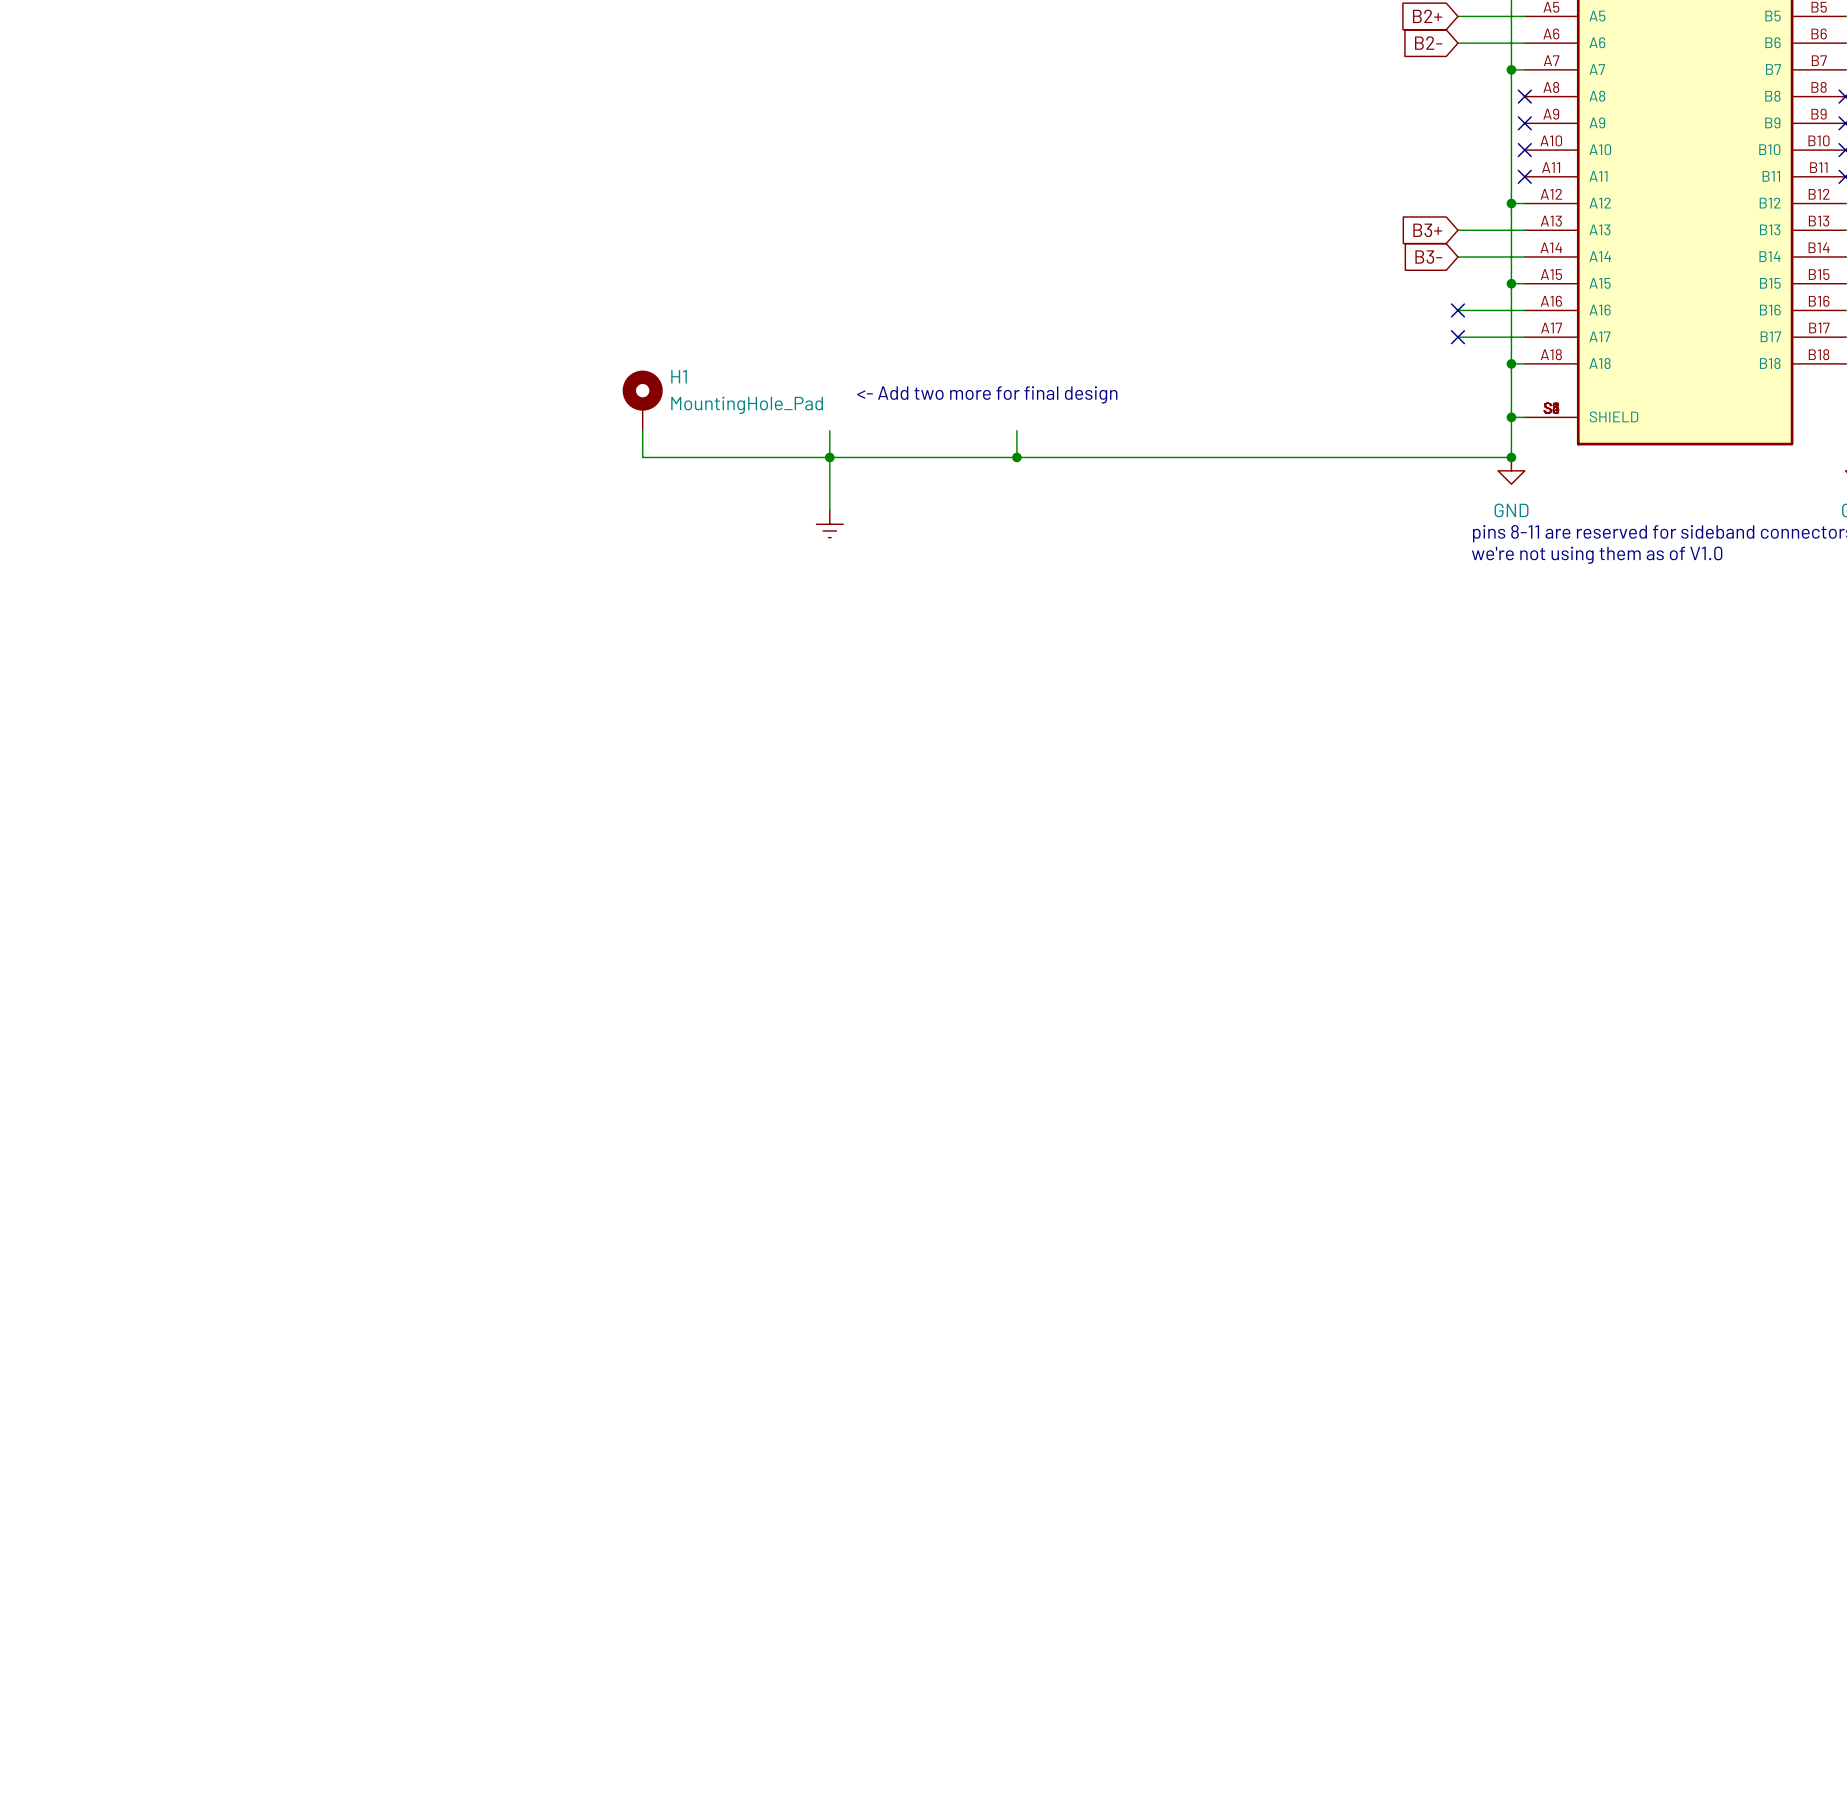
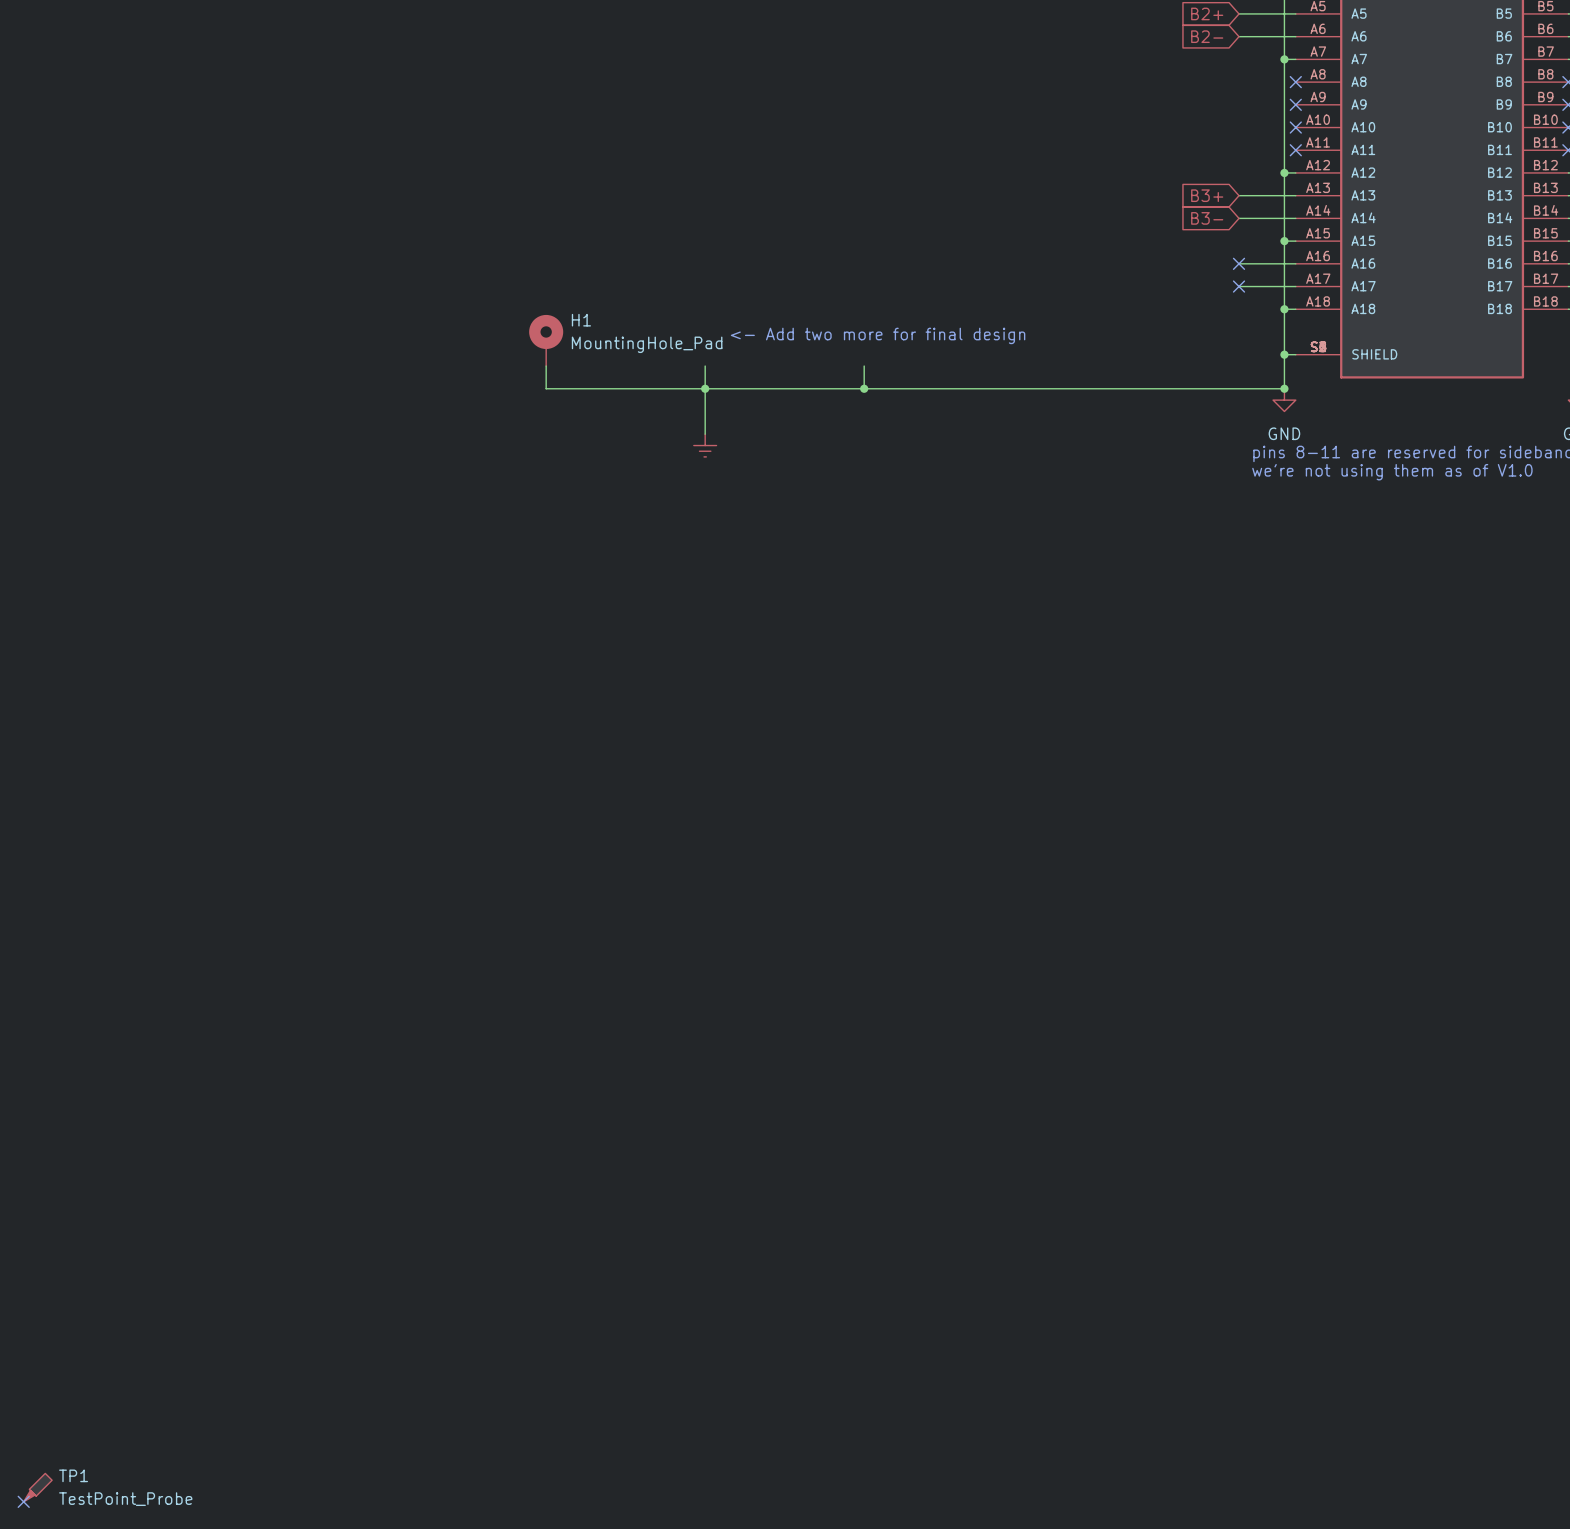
TP1: none -> TestPoint_Probe (37, 1487)
no-connect mark: none -> (23, 1501)

